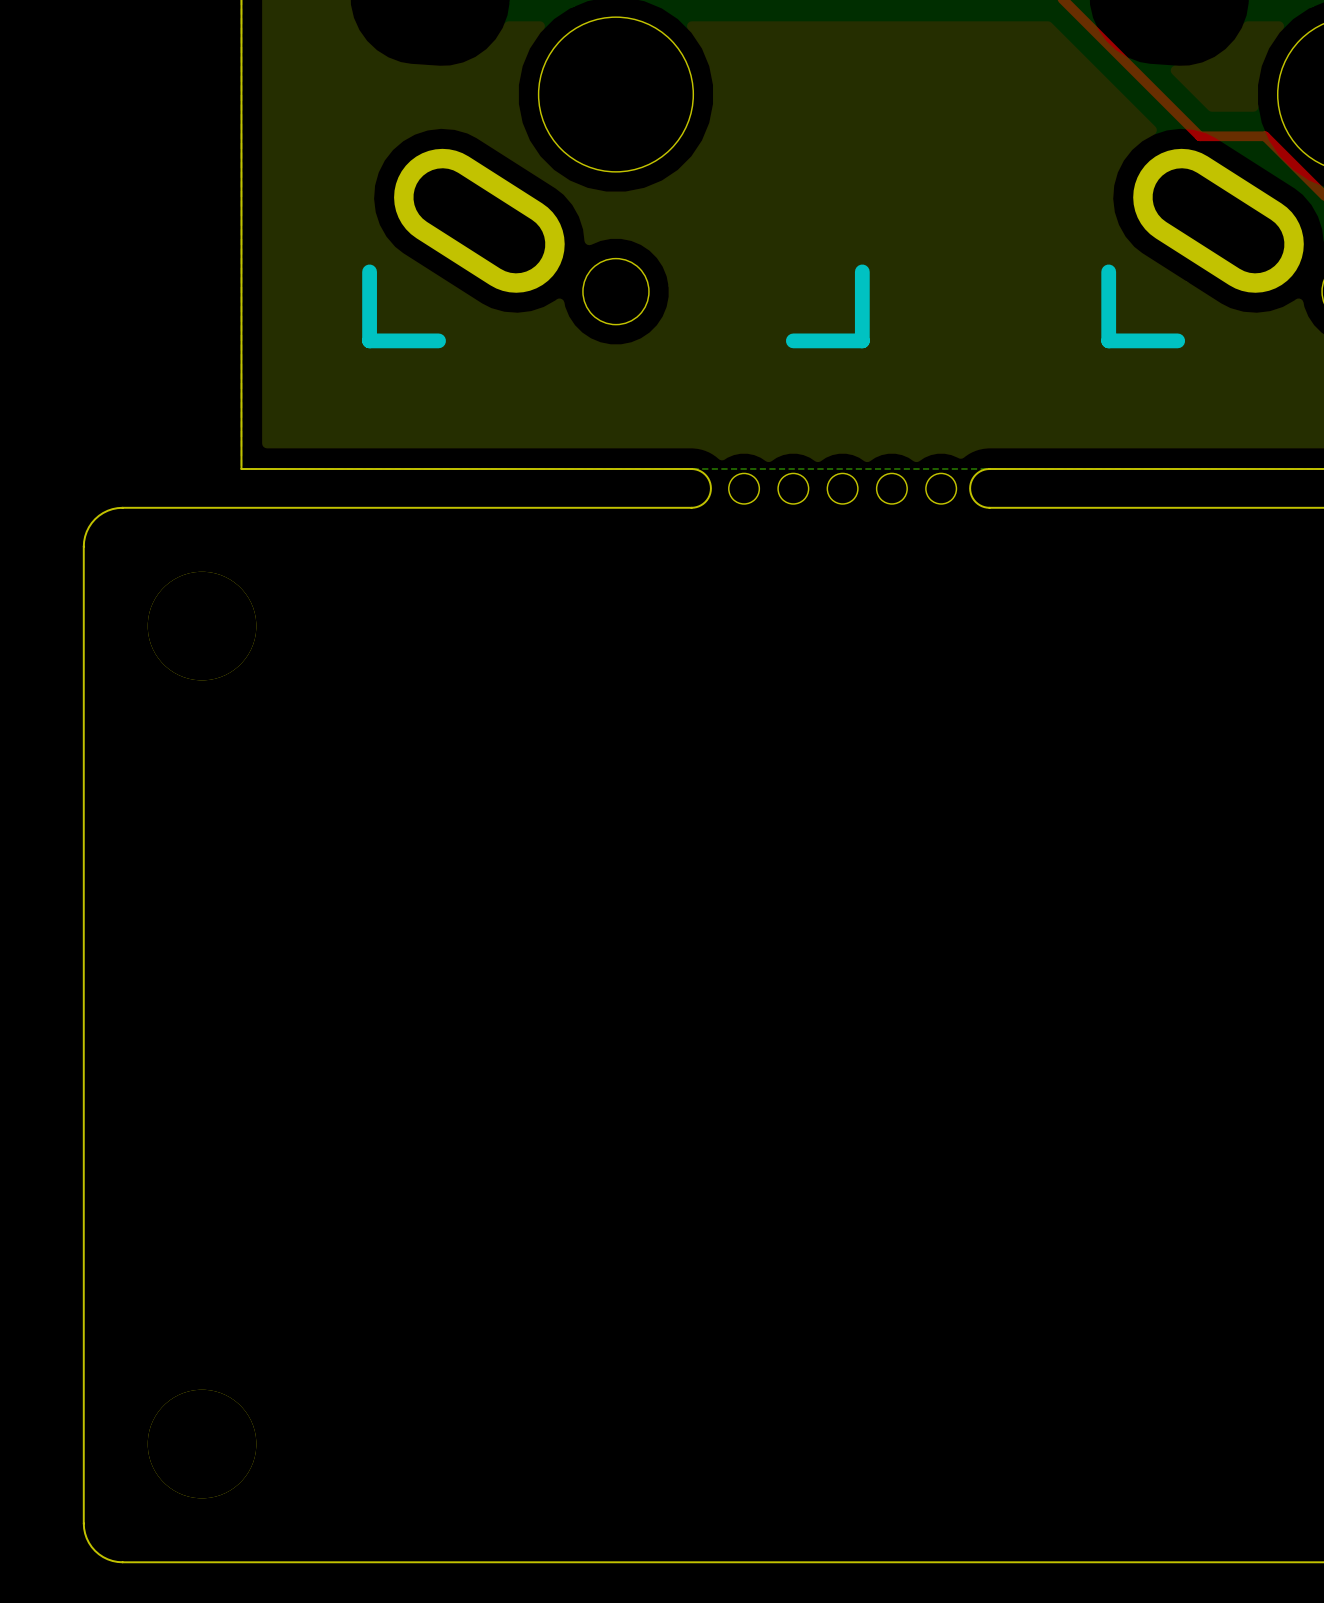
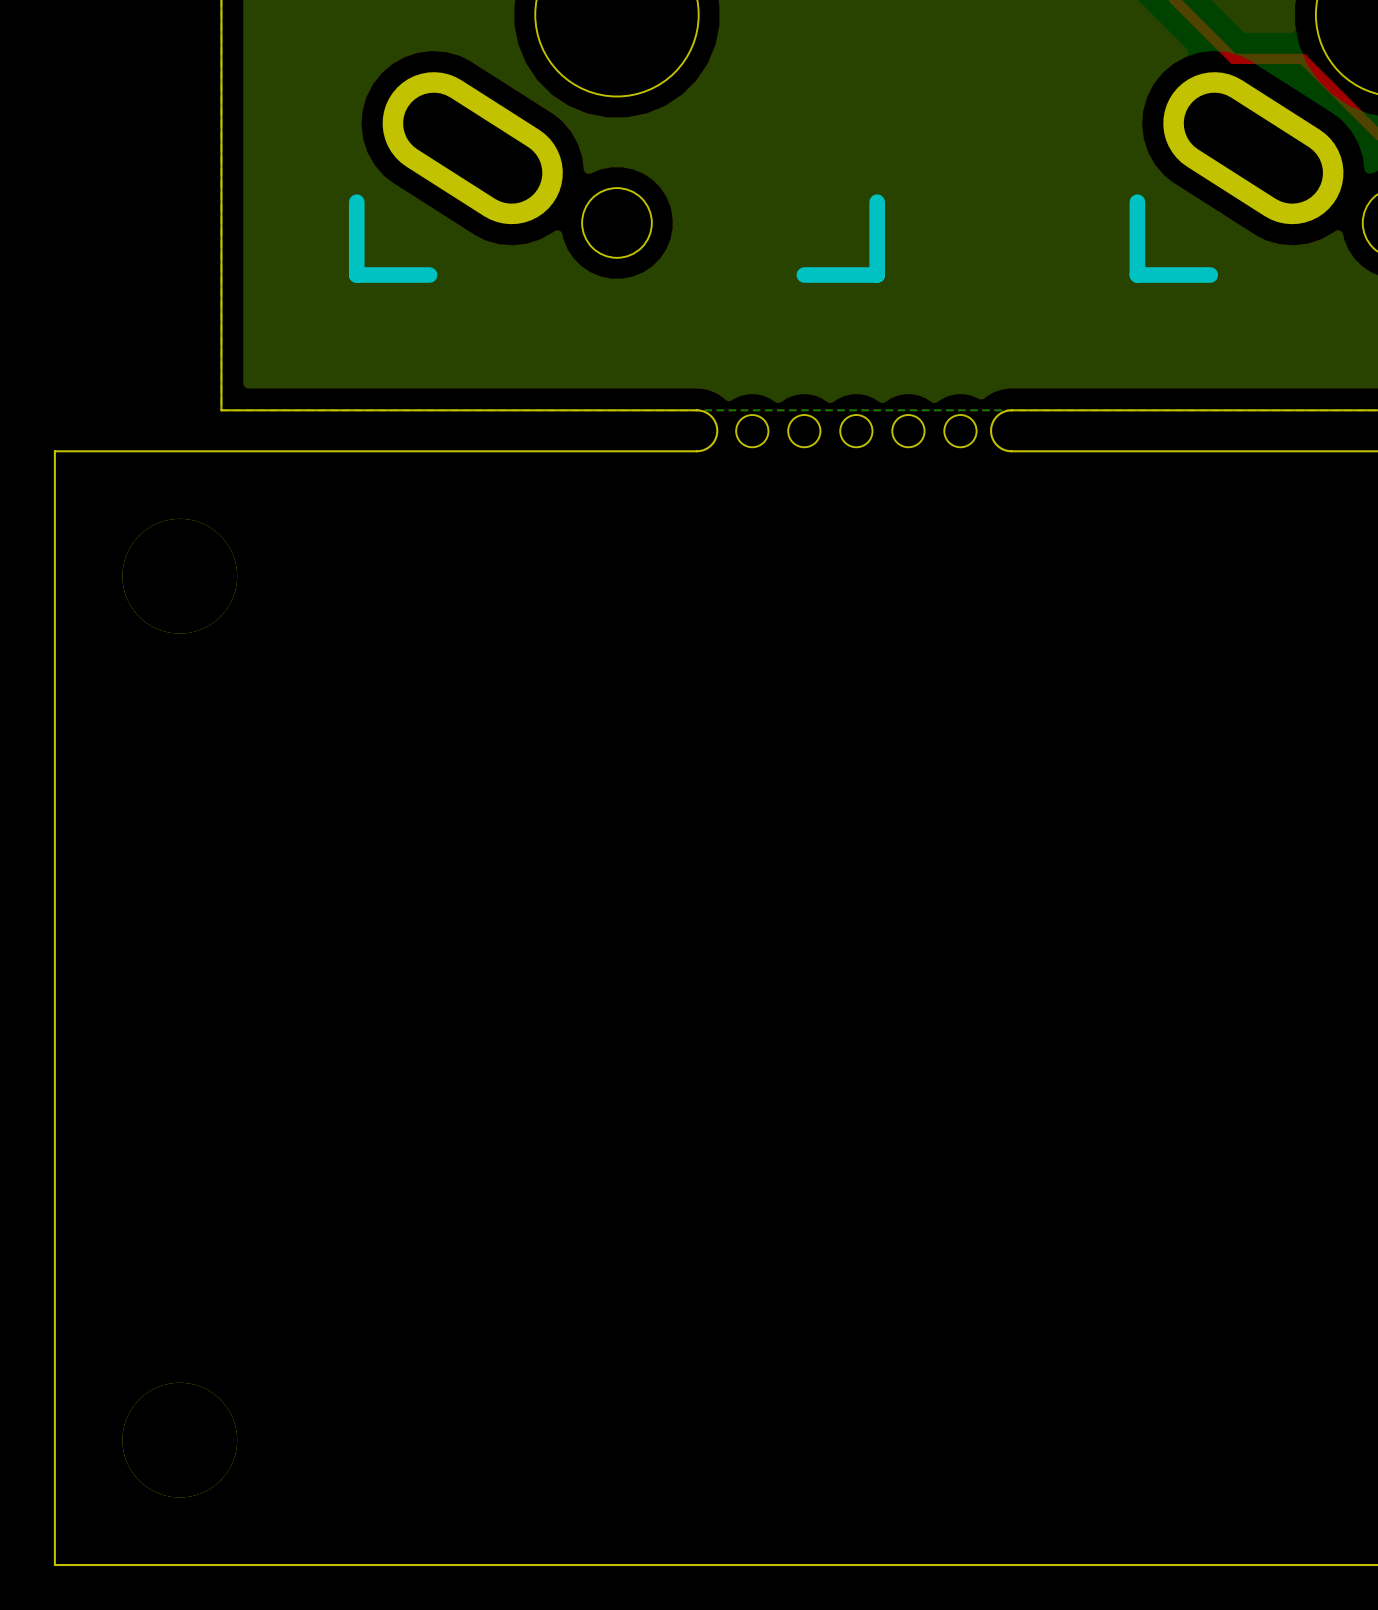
board edge: (122, 507) (107, 510) (95, 519) (86, 531) (83, 546) -> (95, 451) (54, 451) (54, 492)
board edge: (83, 1523) (86, 1538) (95, 1550) (107, 1559) (122, 1562) -> (54, 1524) (54, 1565) (95, 1565)

